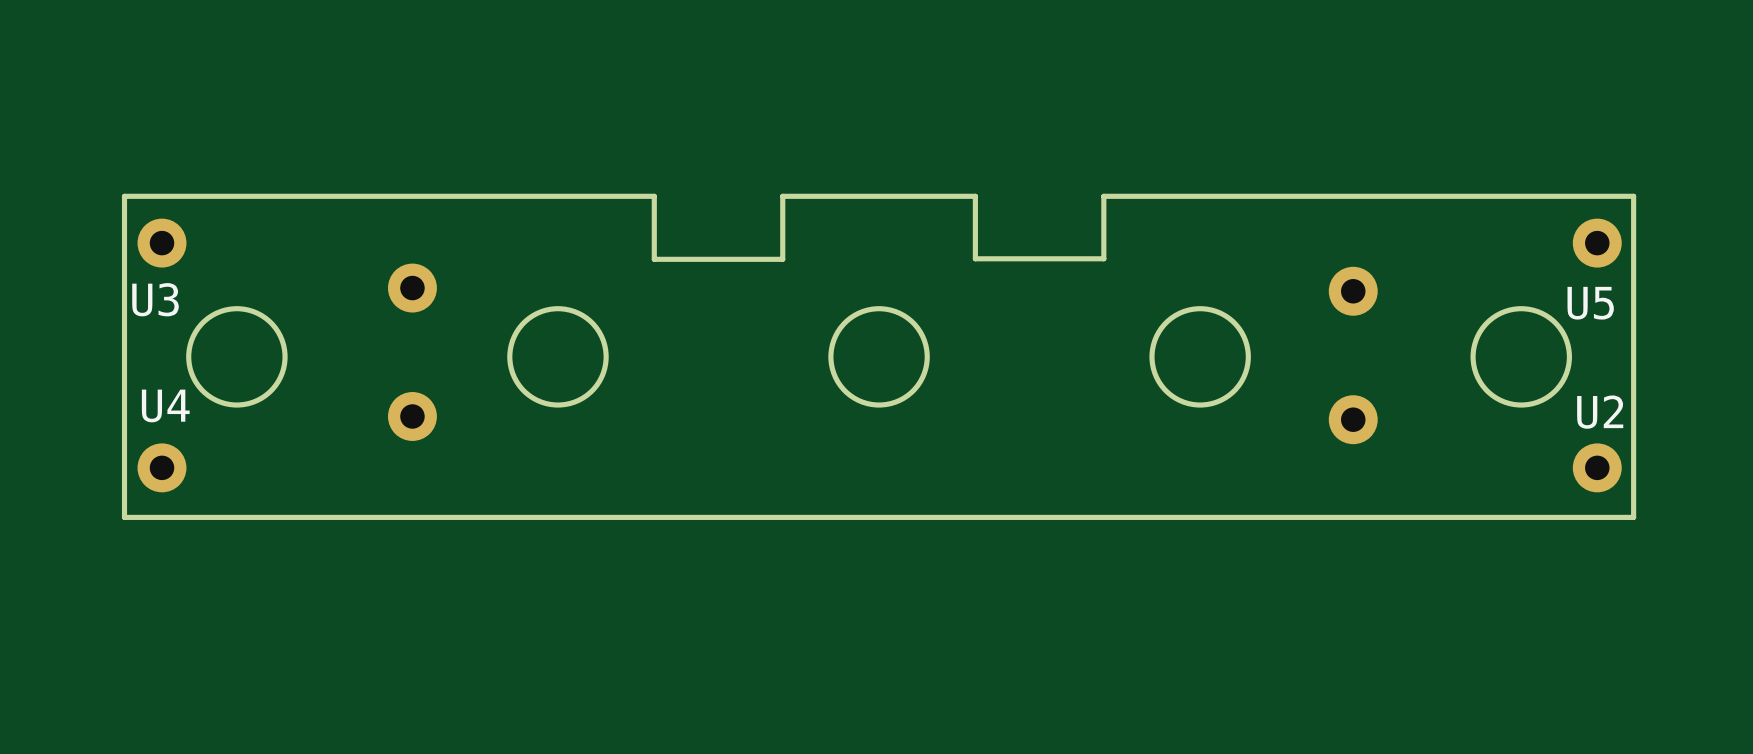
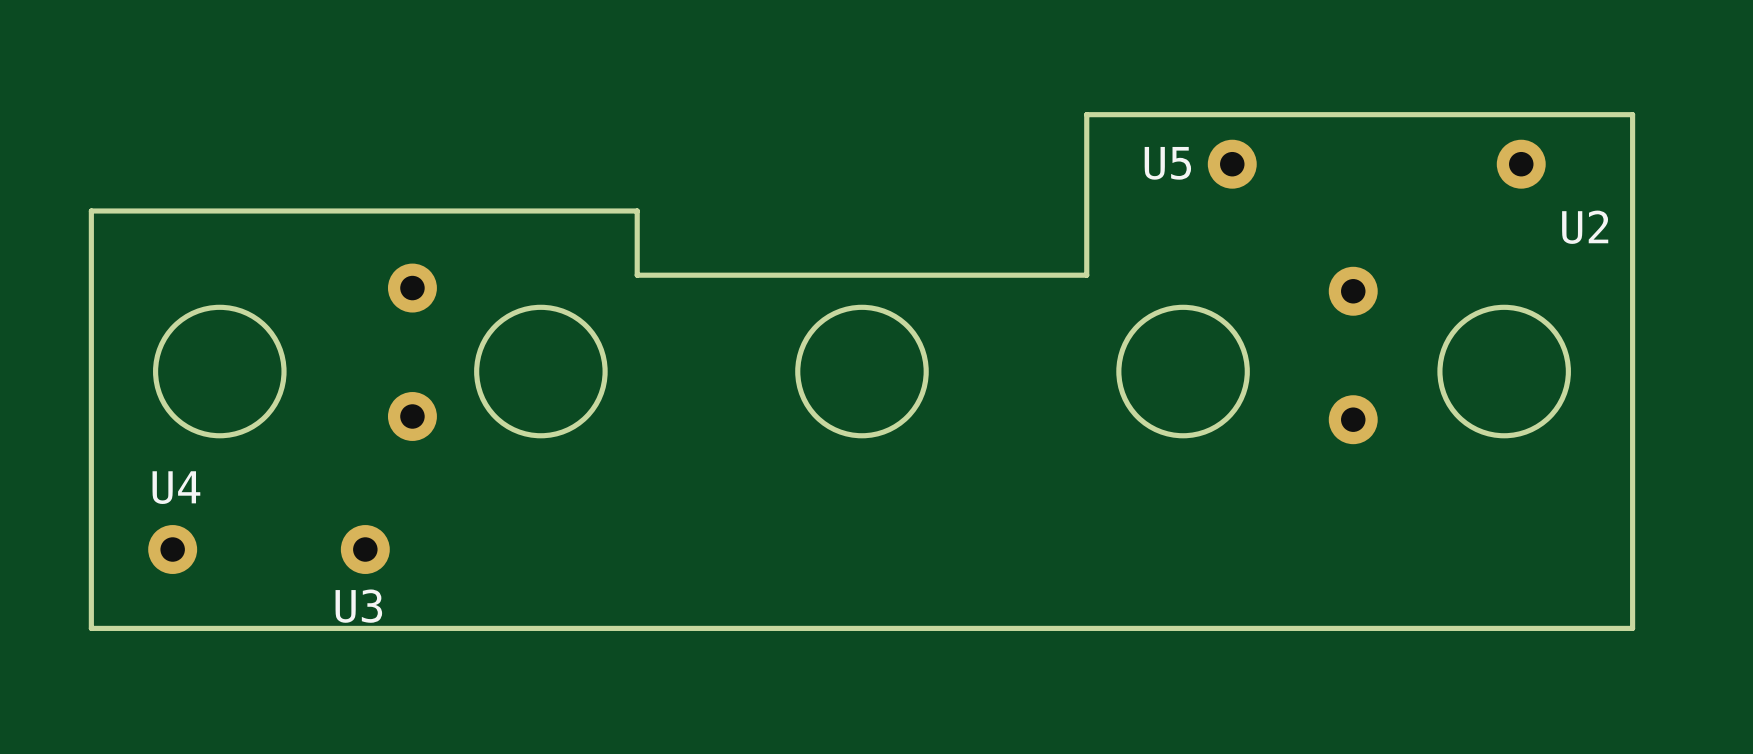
board edge: (1633, 196) (1103, 196) (1103, 258) (975, 258) (975, 196) (782, 196) (782, 259) (654, 259) (654, 196) (124, 196) (124, 517) (1633, 517) (1633, 196) -> (1632, 114) (1632, 628) (91, 628) (91, 210) (637, 210) (637, 275) (1086, 275) (1086, 114) (1632, 114)
U3 position: (162, 243) -> (365, 549)
U5 position: (1597, 243) -> (1232, 164)
U5 name position: U5 (1590, 303) -> U5 (1167, 163)
round board edge size: [186, 306, 288, 408] -> [153, 304, 287, 439]
round board edge size: [507, 306, 609, 408] -> [474, 304, 608, 439]
round board edge size: [828, 306, 930, 408] -> [795, 304, 929, 439]
round board edge size: [1149, 306, 1251, 408] -> [1116, 304, 1250, 439]
round board edge size: [1470, 306, 1572, 408] -> [1437, 304, 1571, 439]
U2 name position: U2 (1600, 412) -> U2 (1585, 227)
U4 position: (162, 467) -> (172, 549)
U2 position: (1597, 467) -> (1521, 164)

